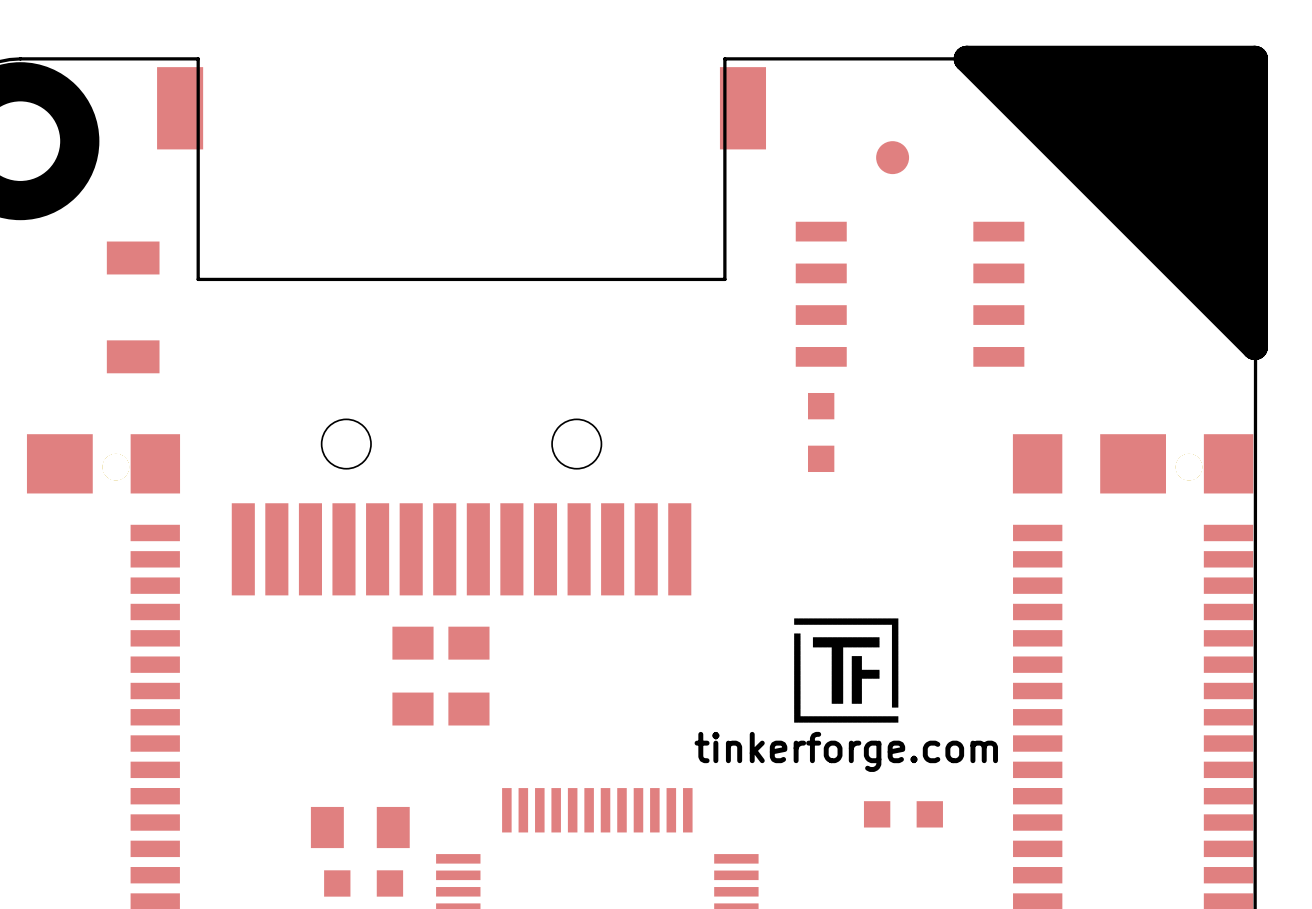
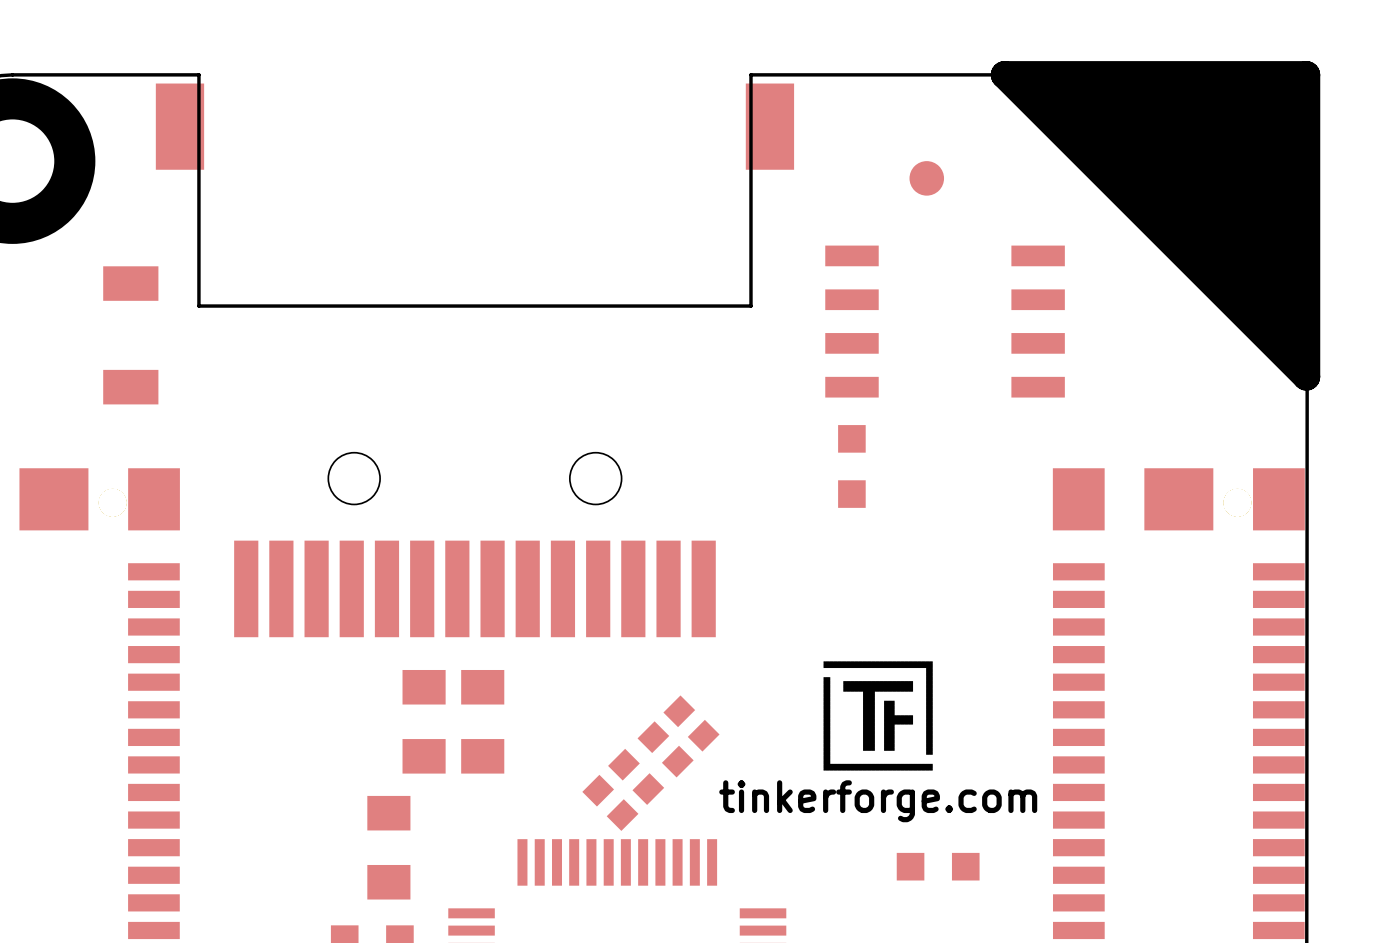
part: none -> (691, 723)
part: none -> (665, 749)
part: none -> (636, 776)
part: none -> (610, 802)
part rotation: 0° (360, 827) -> 90° clockwise (388, 847)

